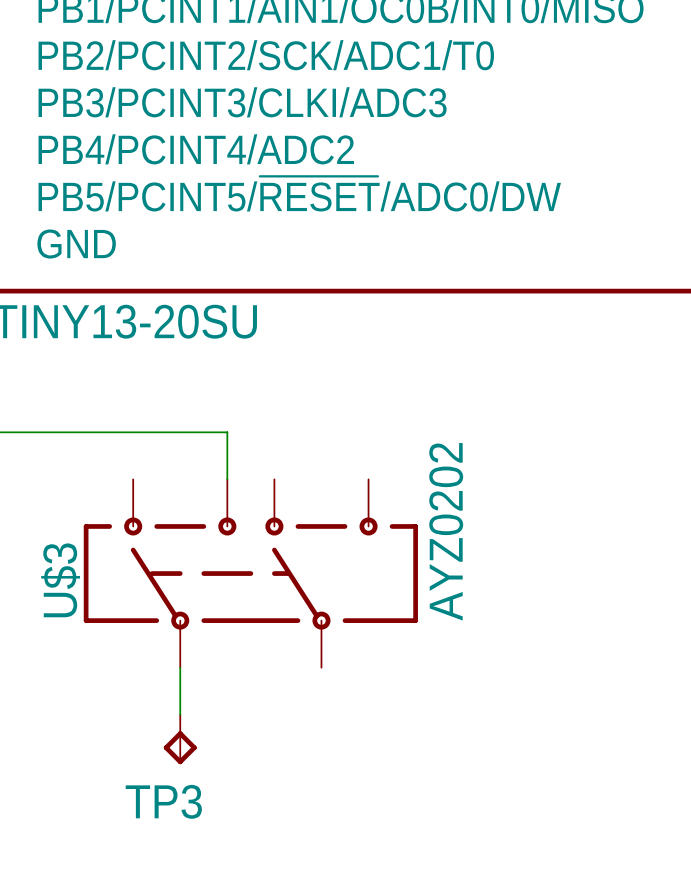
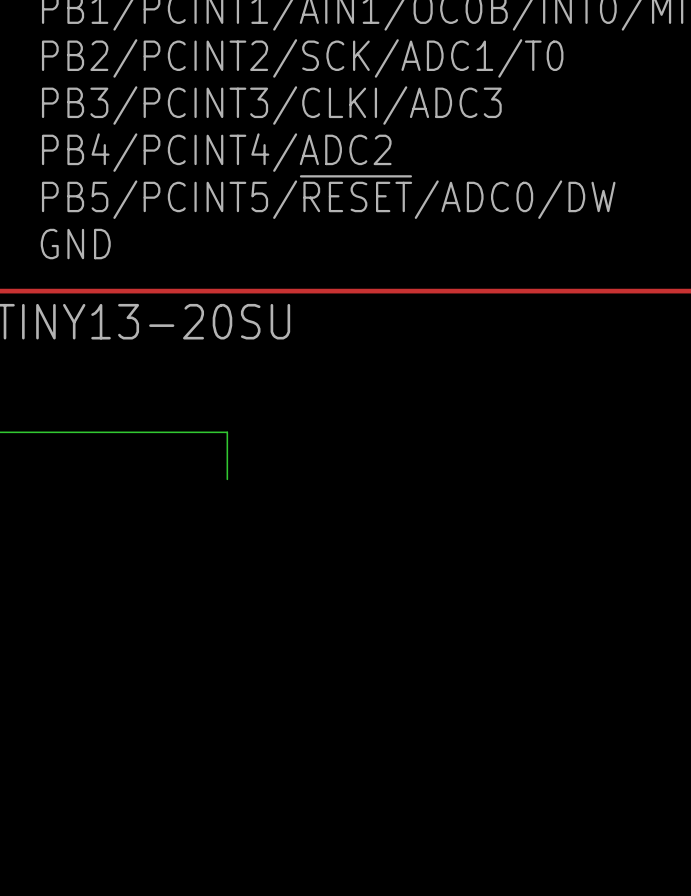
U$3: AYZ0202 (250, 573) -> none
wire: (180, 667) (180, 714) -> none
TP3: (180, 739) -> none

